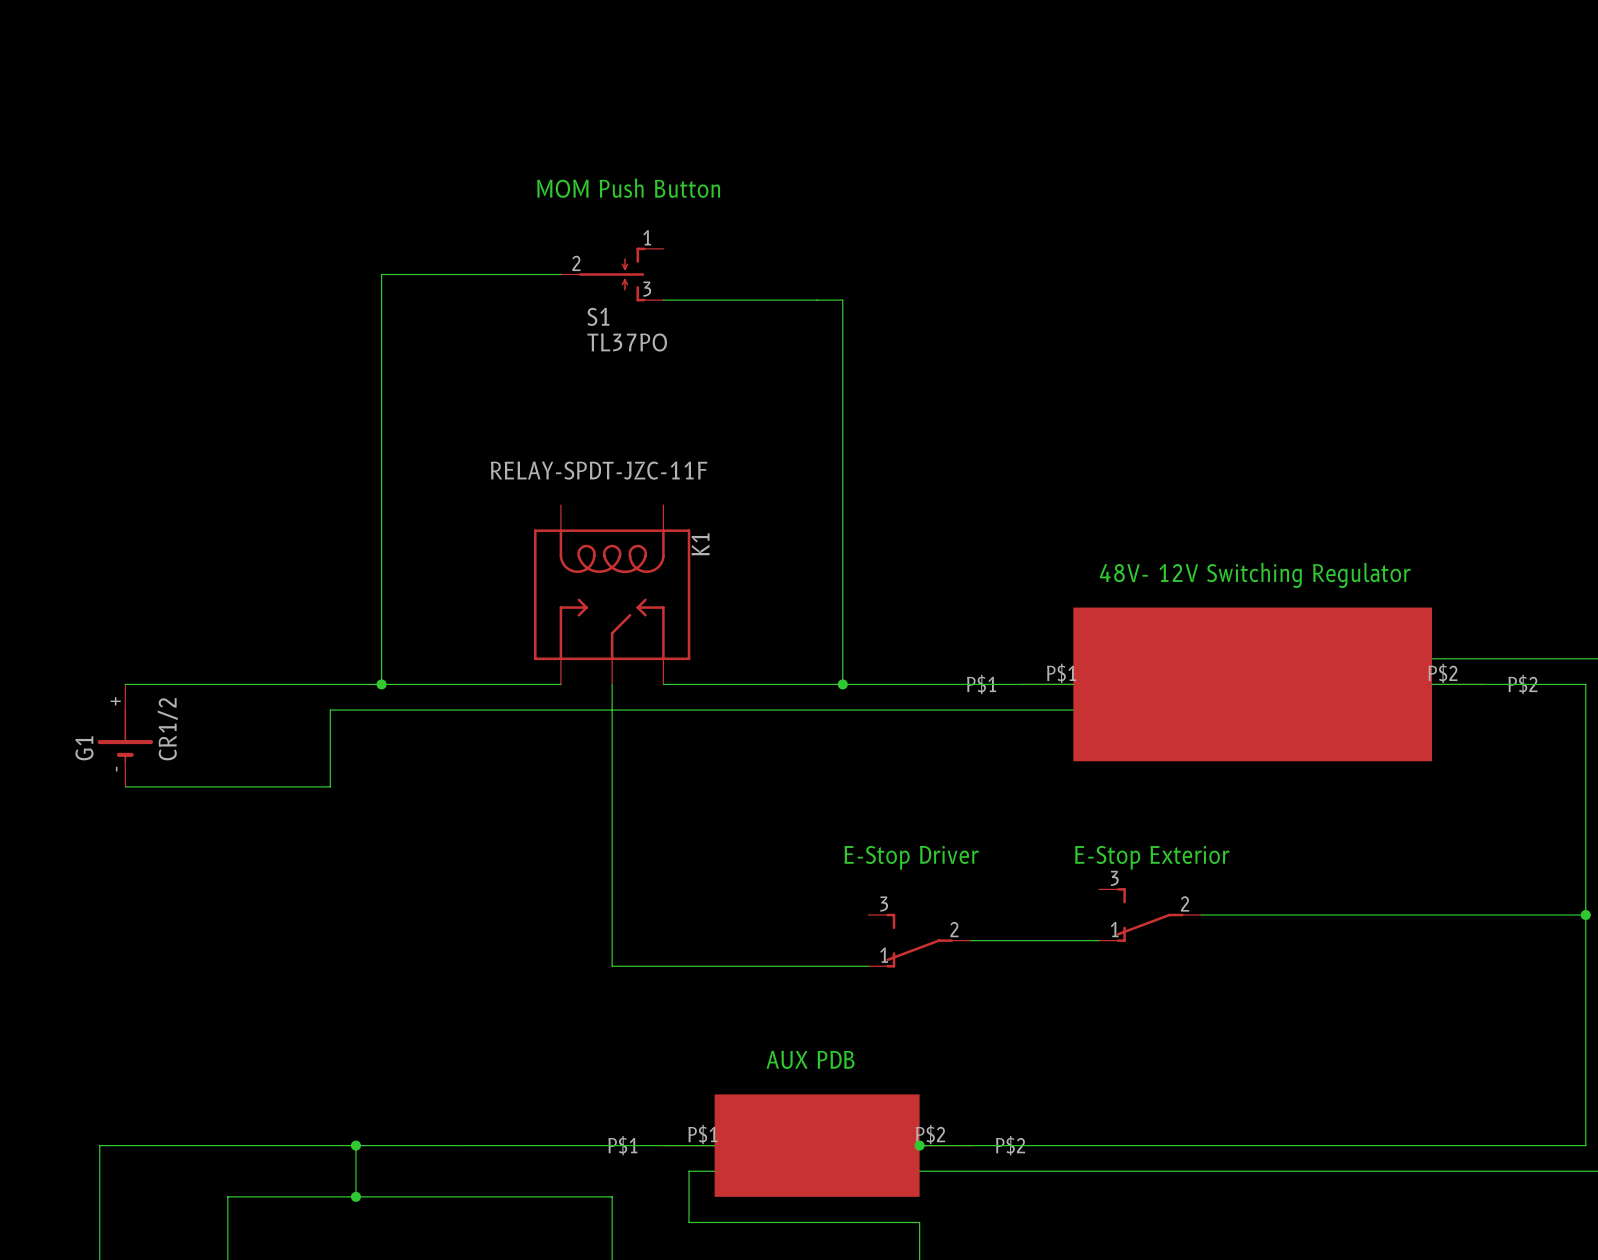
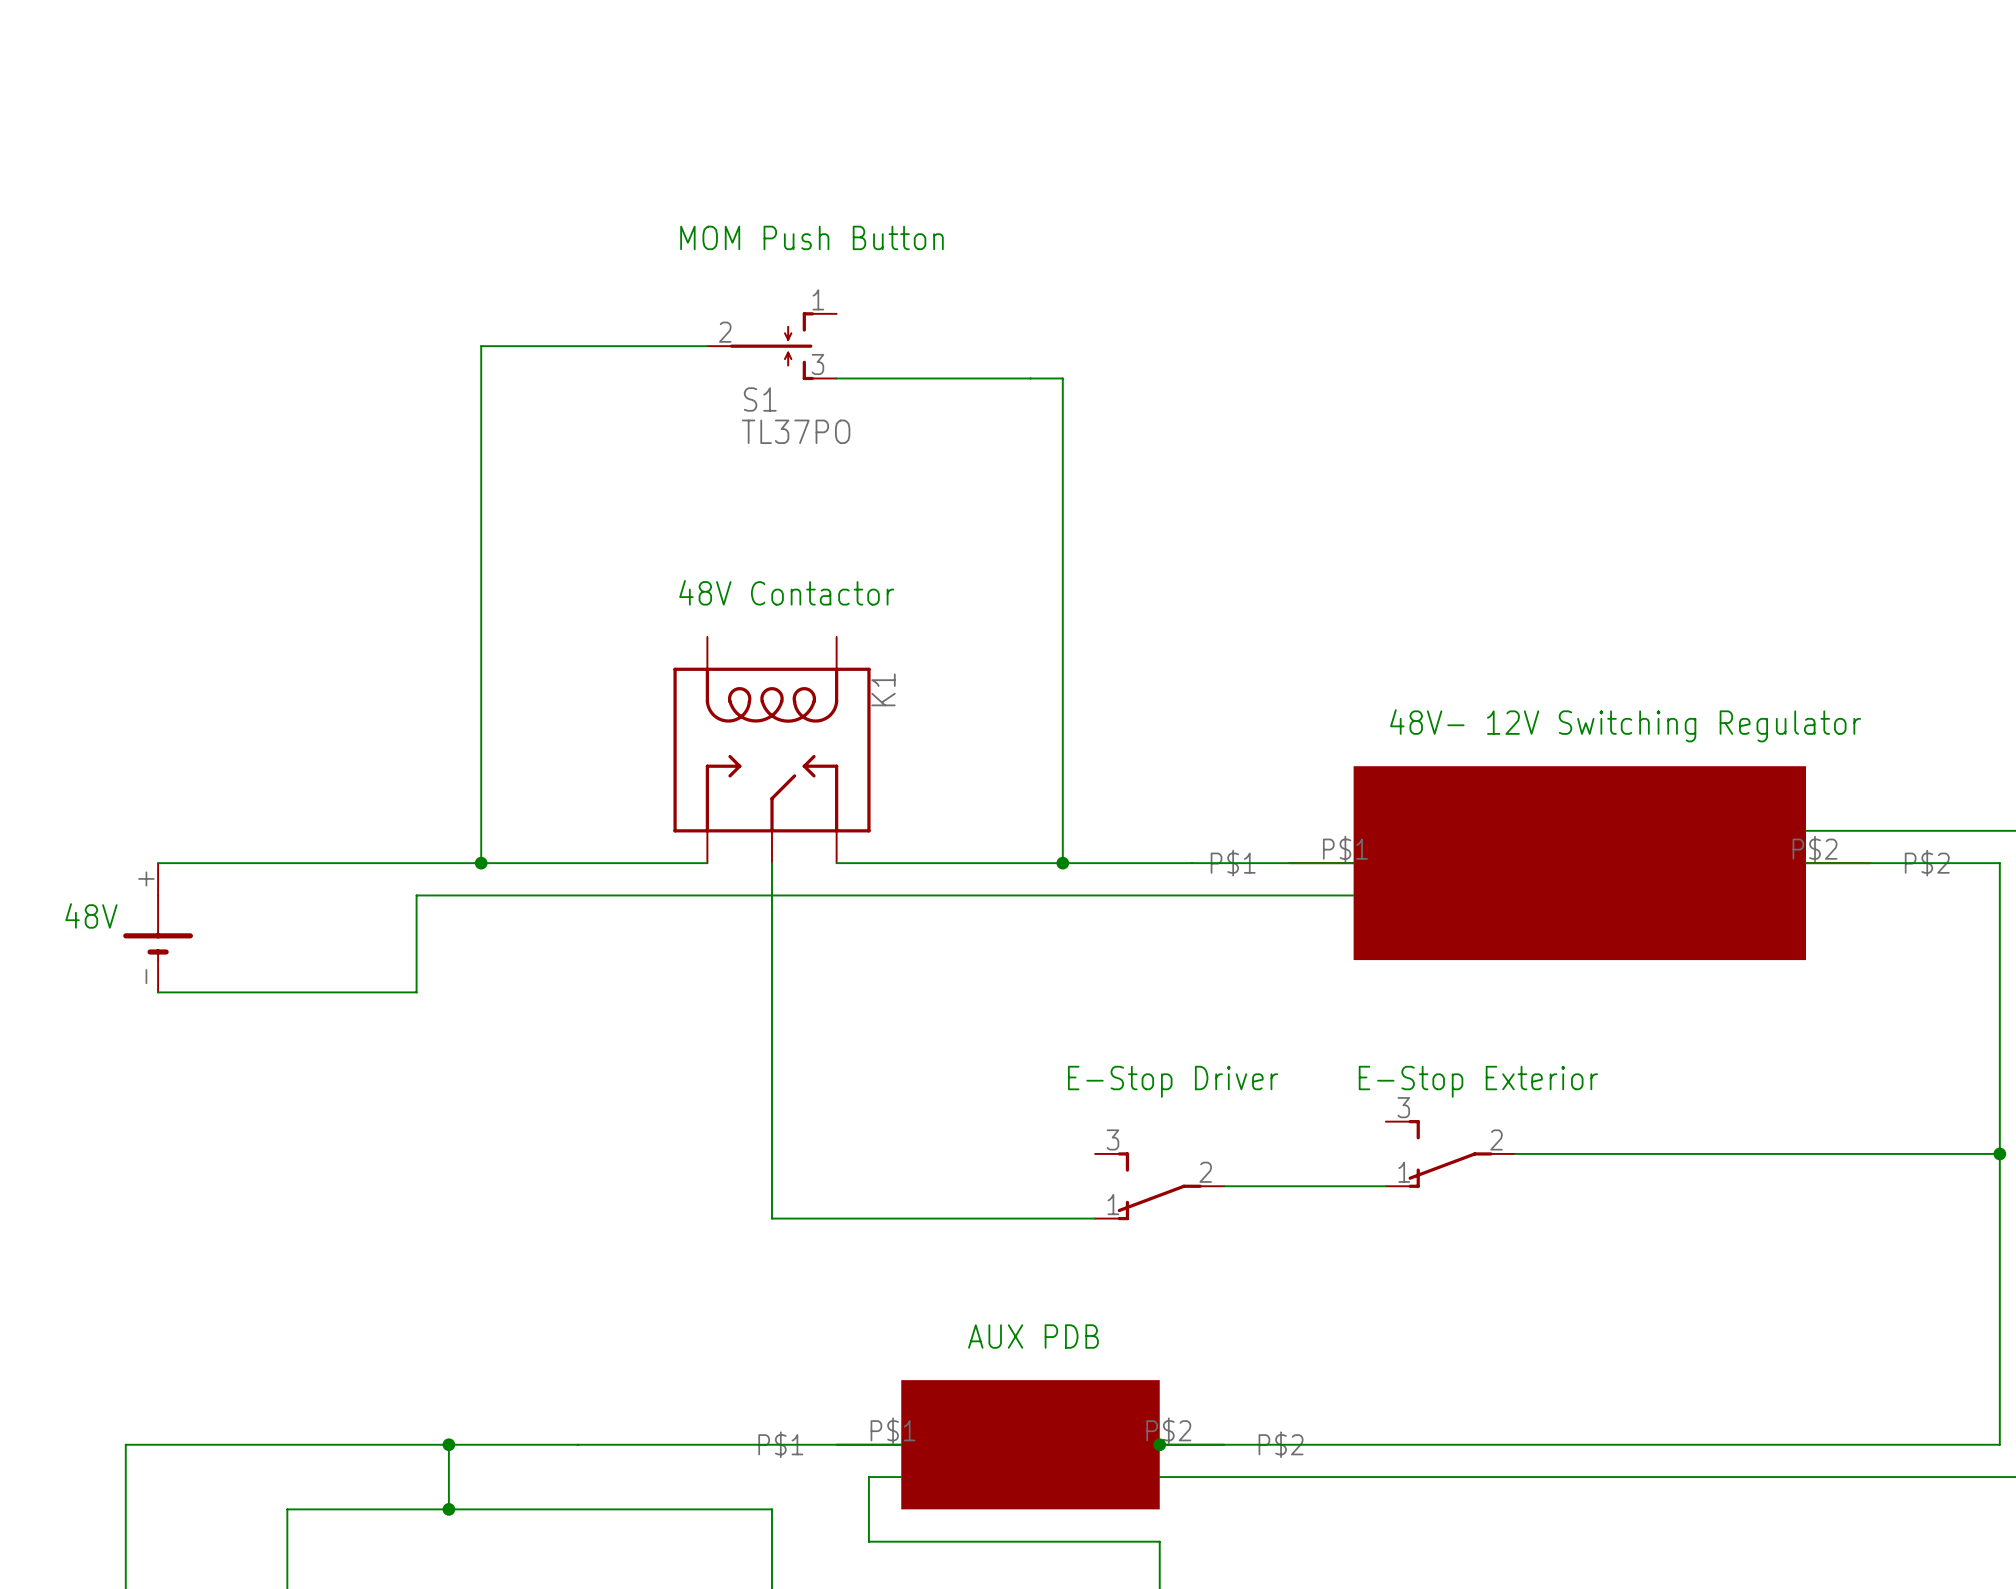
K1 value: RELAY-SPDT-JZC-11F (599, 470) -> none
text: none -> 48V Contactor (786, 592)
text: none -> 48V (91, 915)
G1 value: CR1/2 (167, 729) -> none
G1 name: G1 (84, 748) -> none

